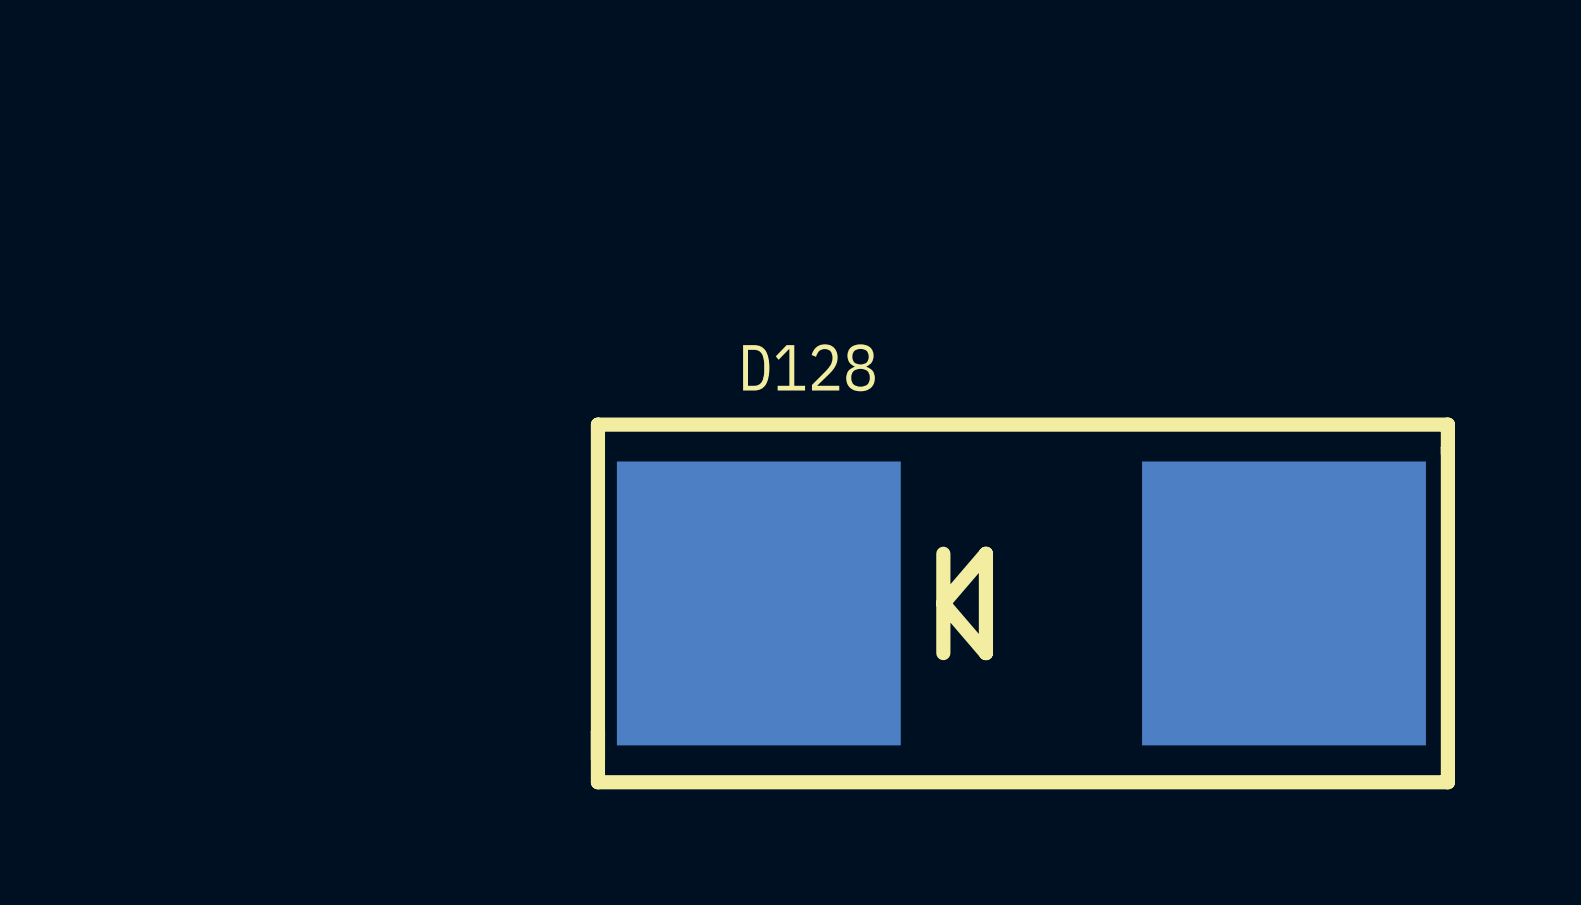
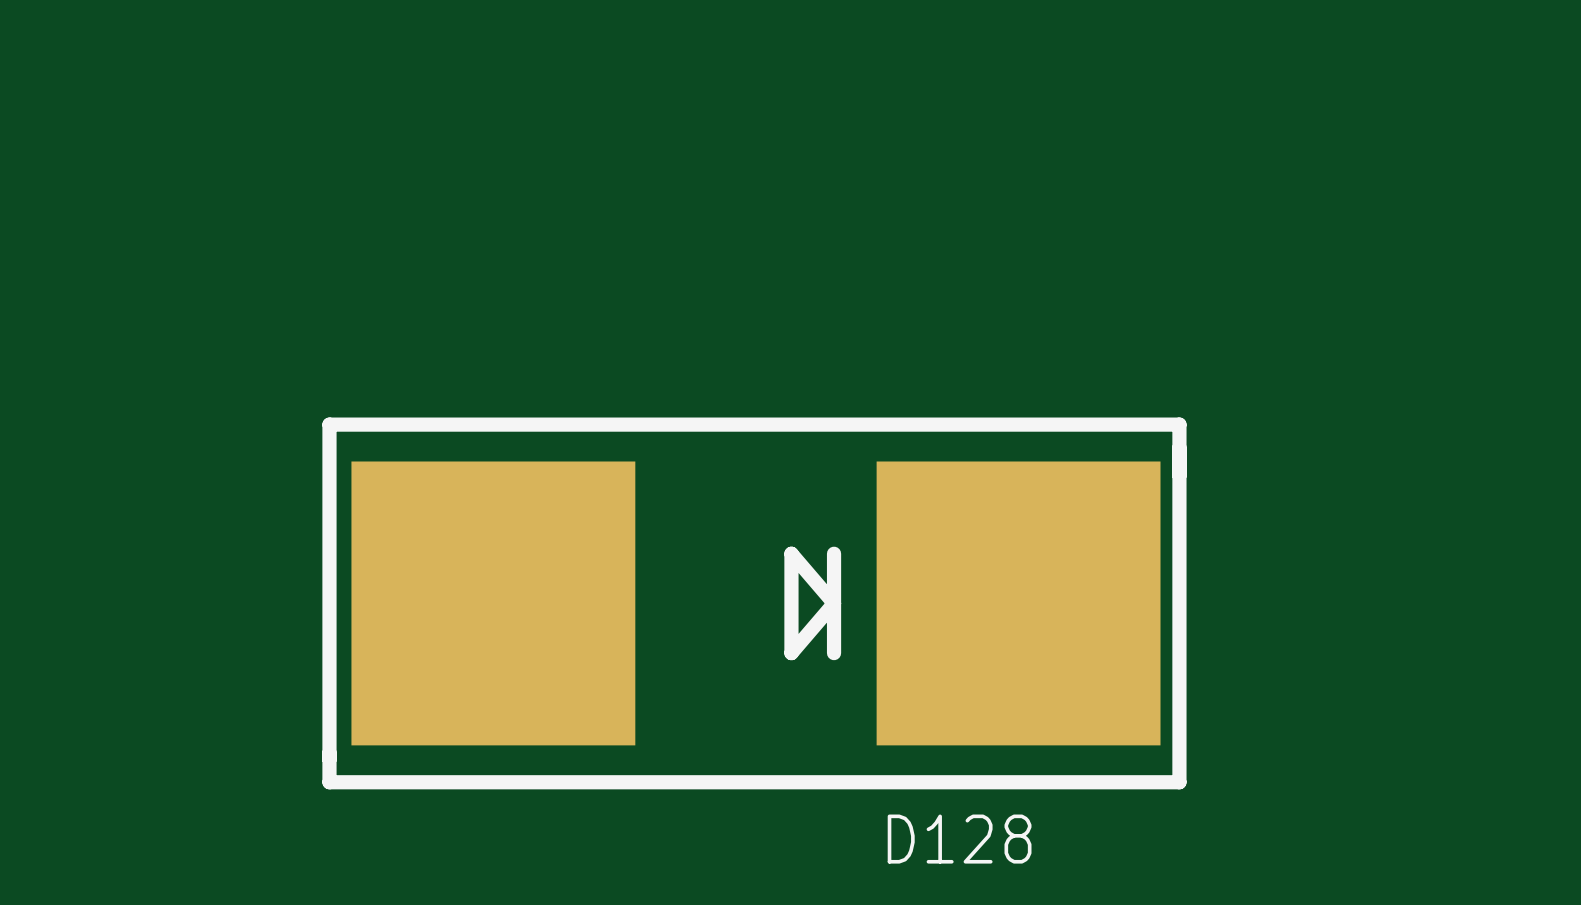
D128 rotation: 0° (1022, 603) -> 180° (754, 603)

